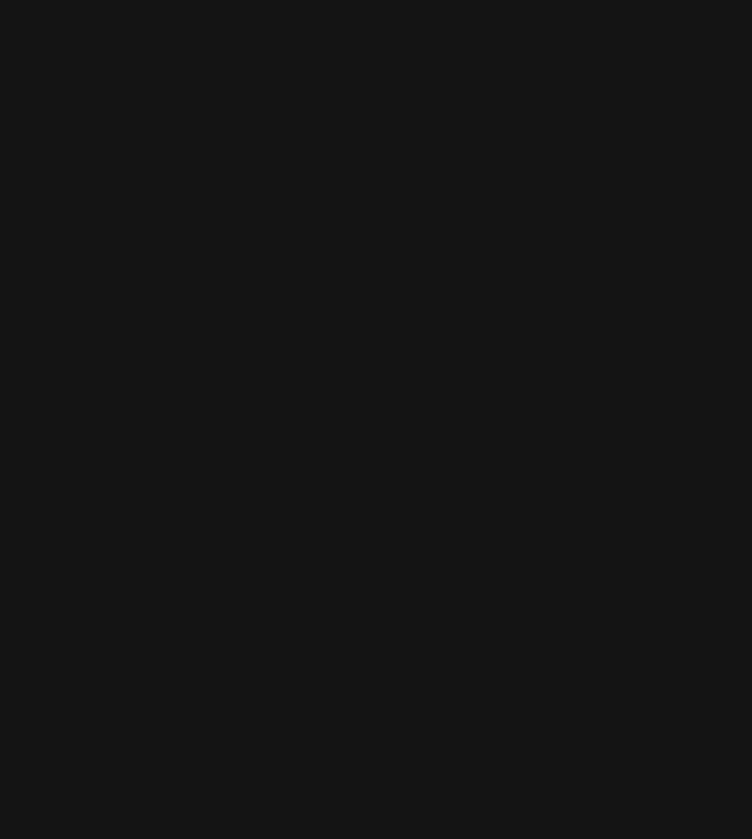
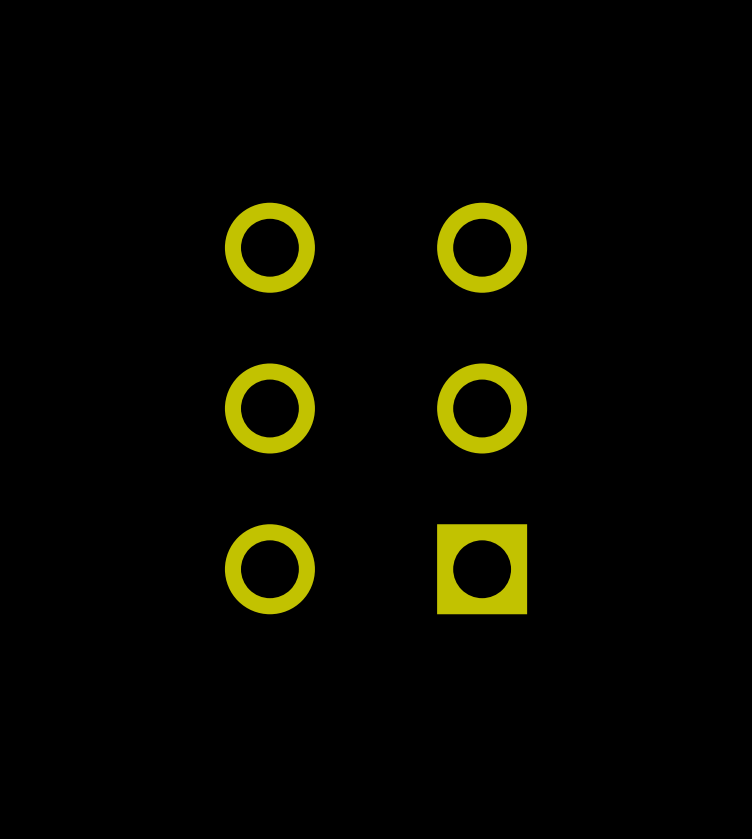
part: none -> (376, 408)

